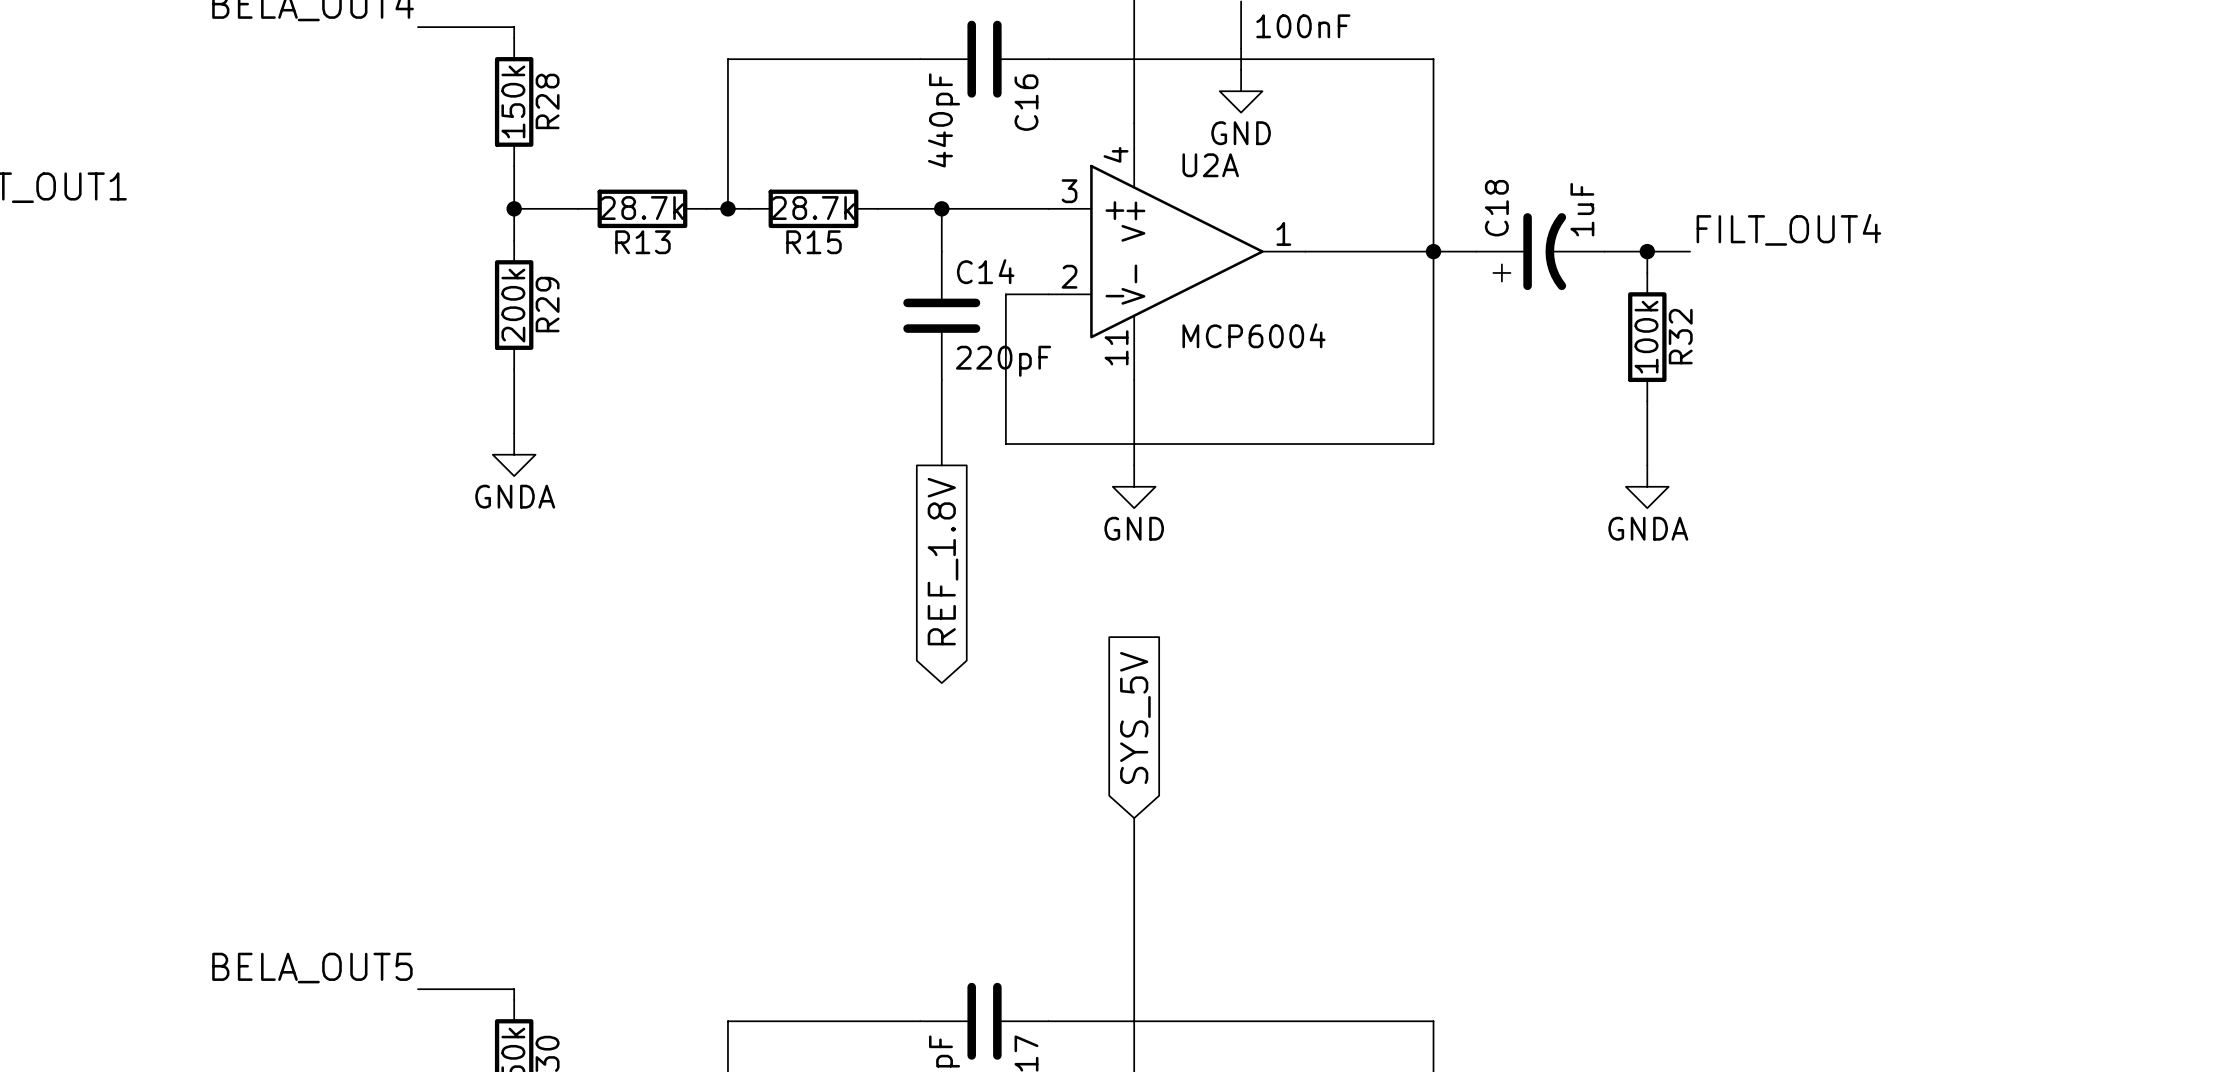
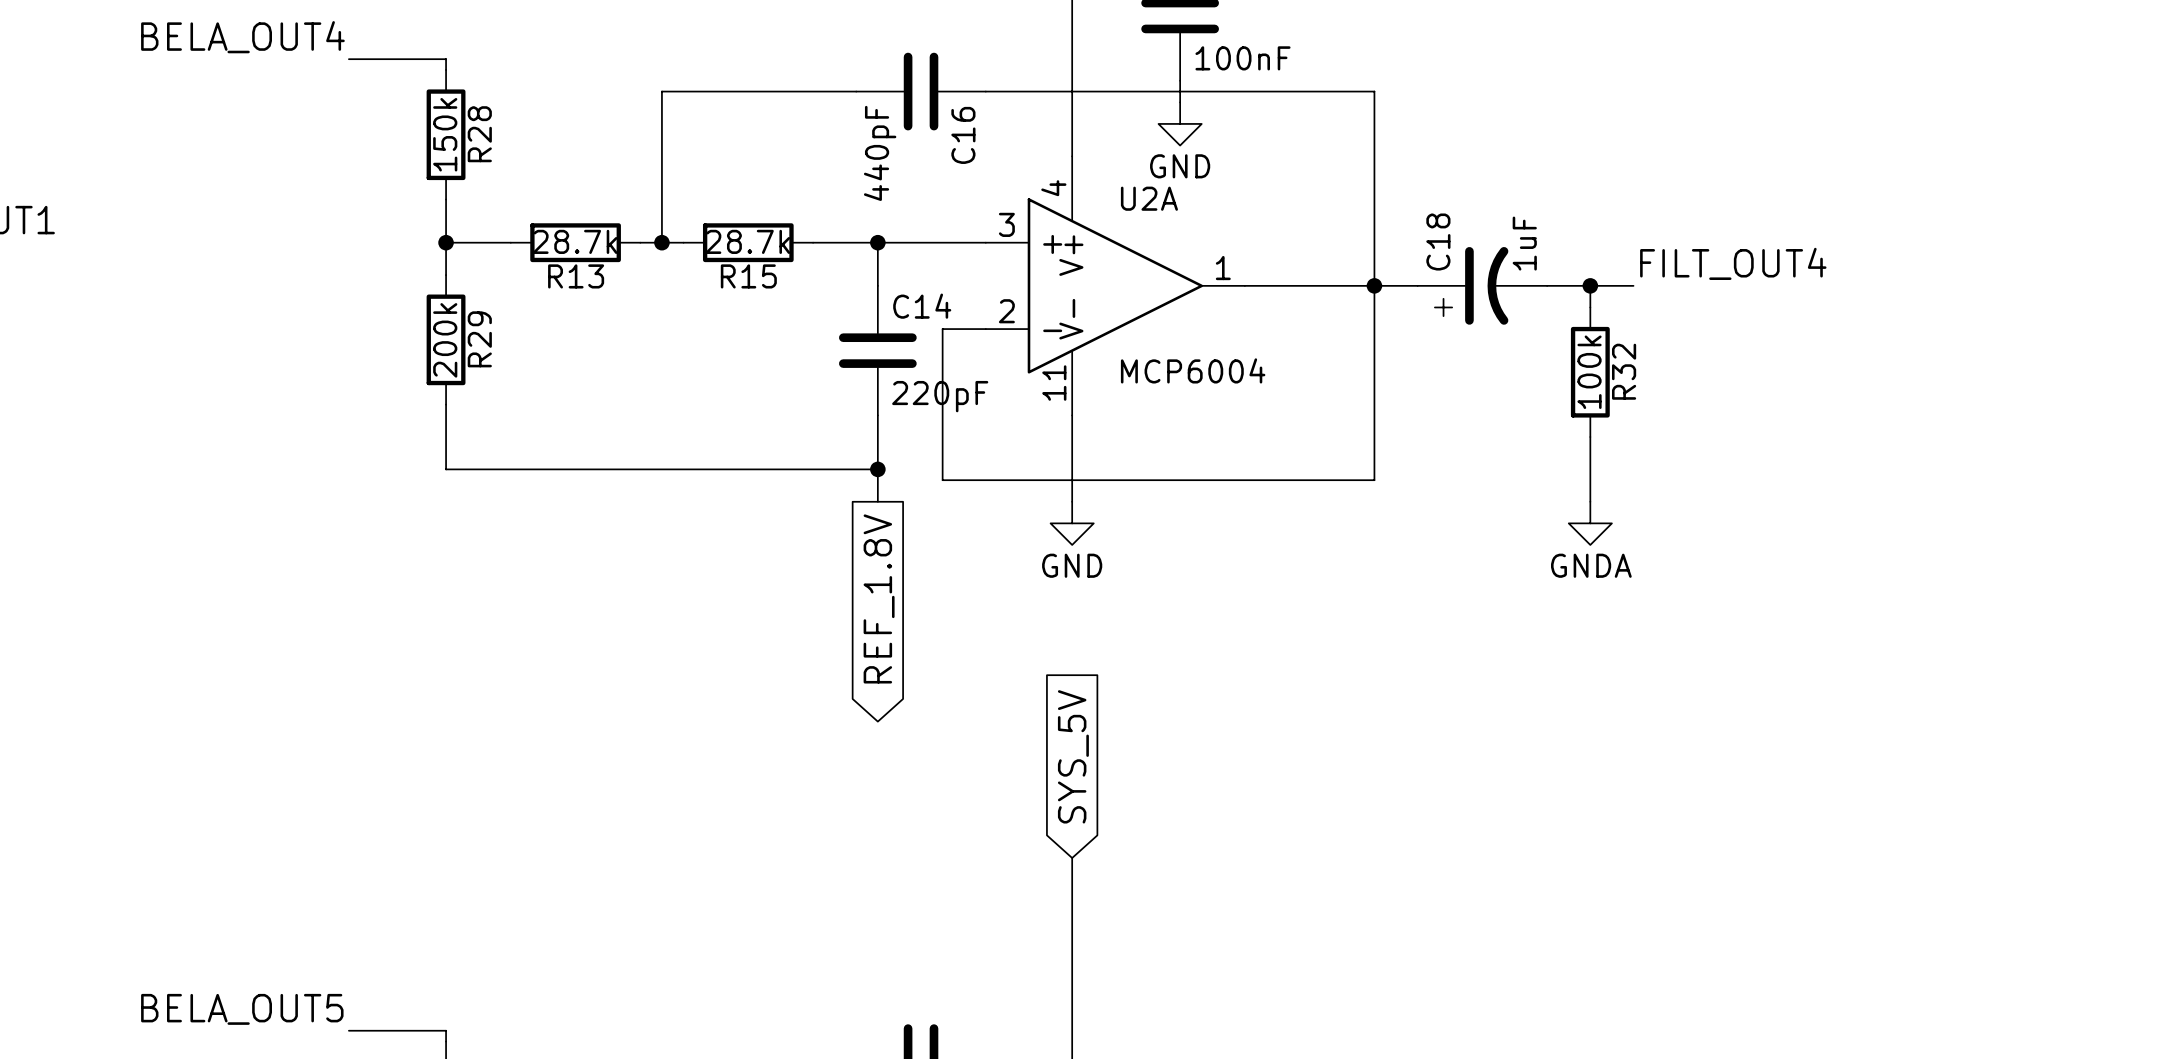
wire: none -> (446, 469) (877, 469)
junction: none -> (877, 469)
power symbol: GNDA (514, 454) -> none

